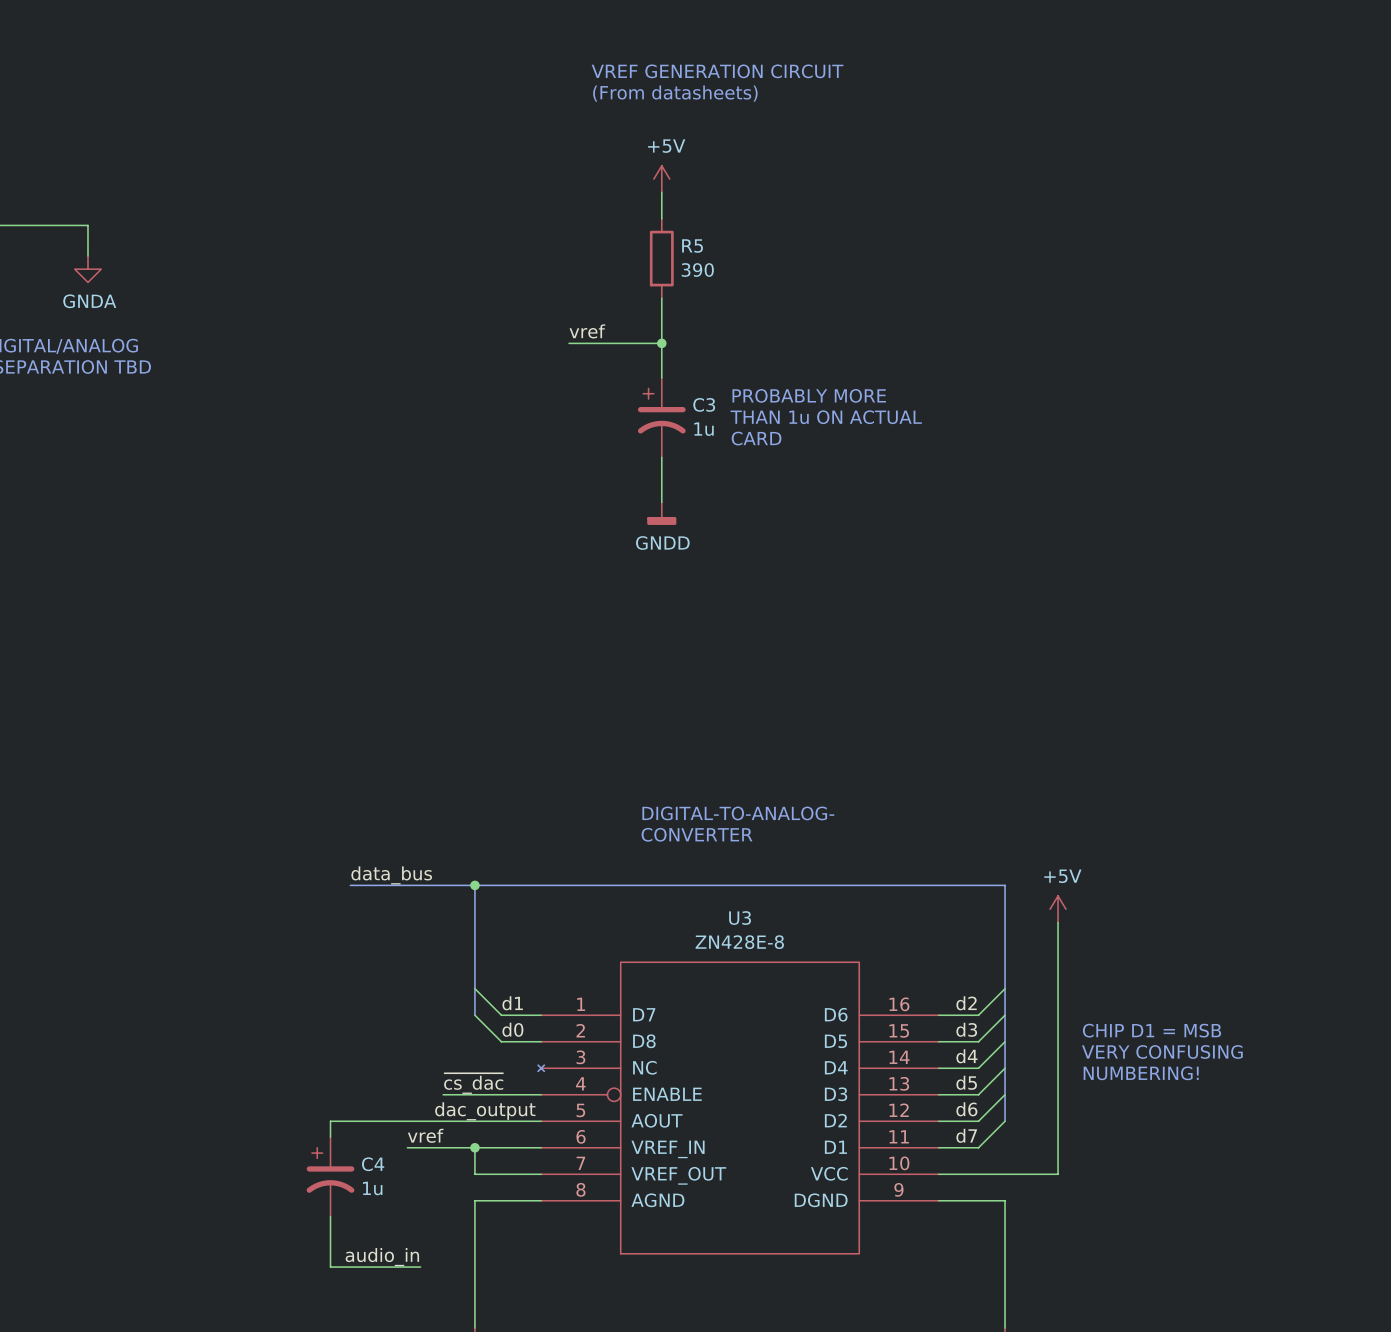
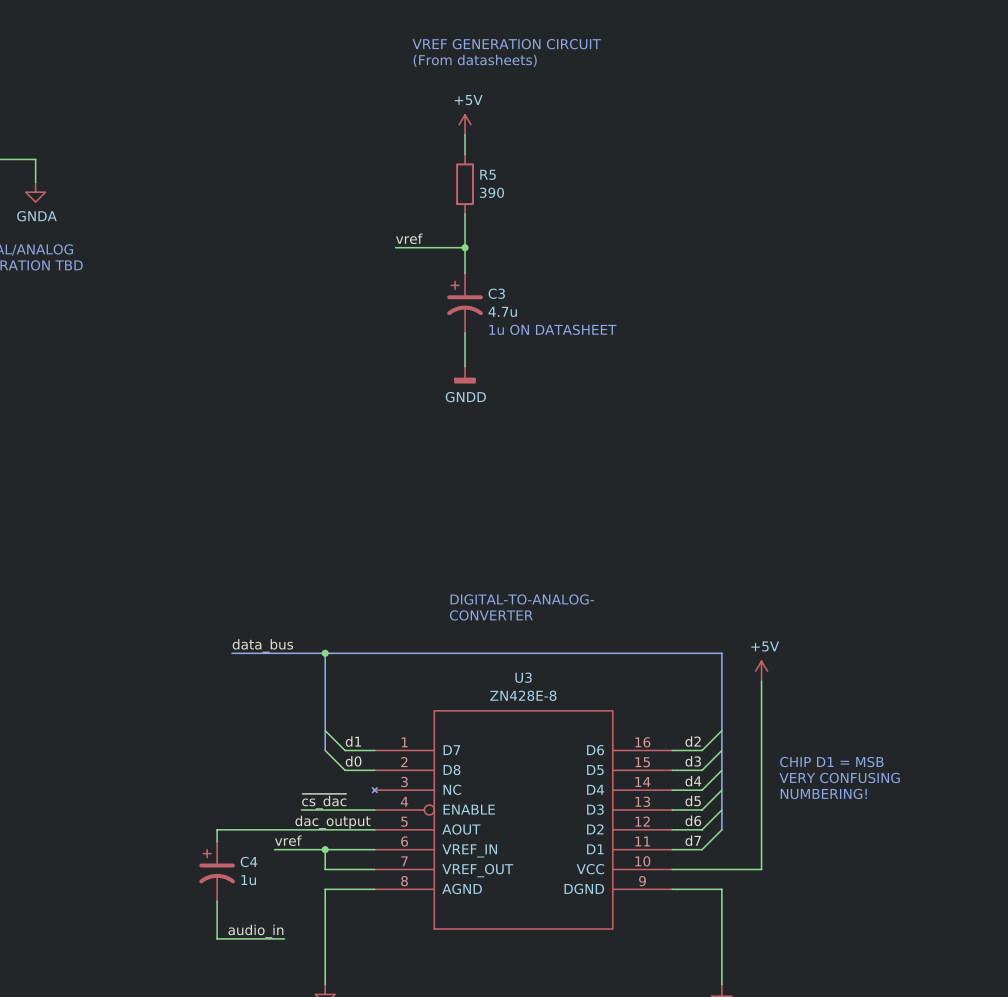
text: PROBABLY MORE (809, 395) -> none
text: THAN 1u ON ACTUAL (826, 417) -> none
C3 value: 1u (703, 429) -> 4.7u (502, 311)
text: CARD (756, 438) -> none
text: none -> 1u ON DATASHEET (552, 329)

